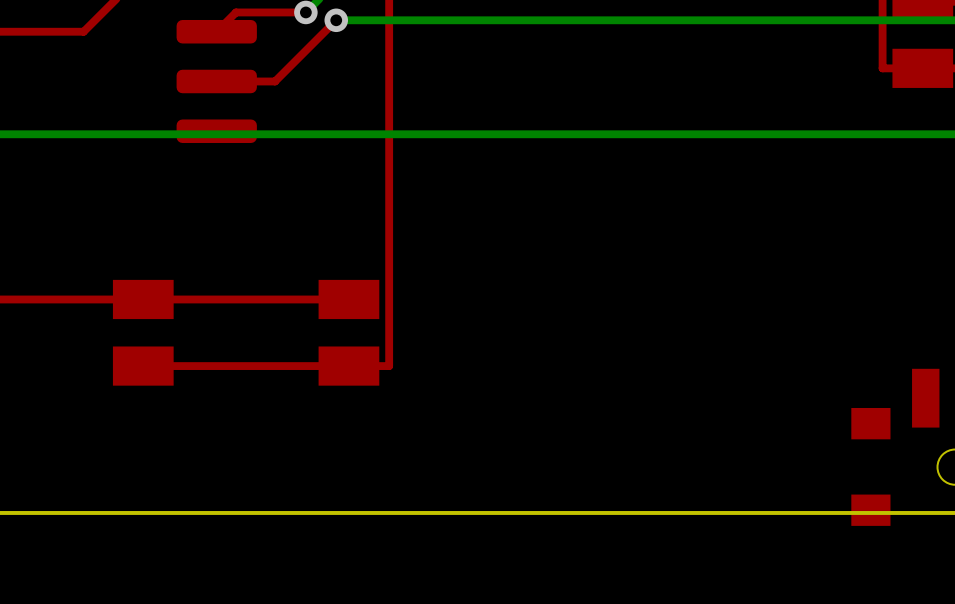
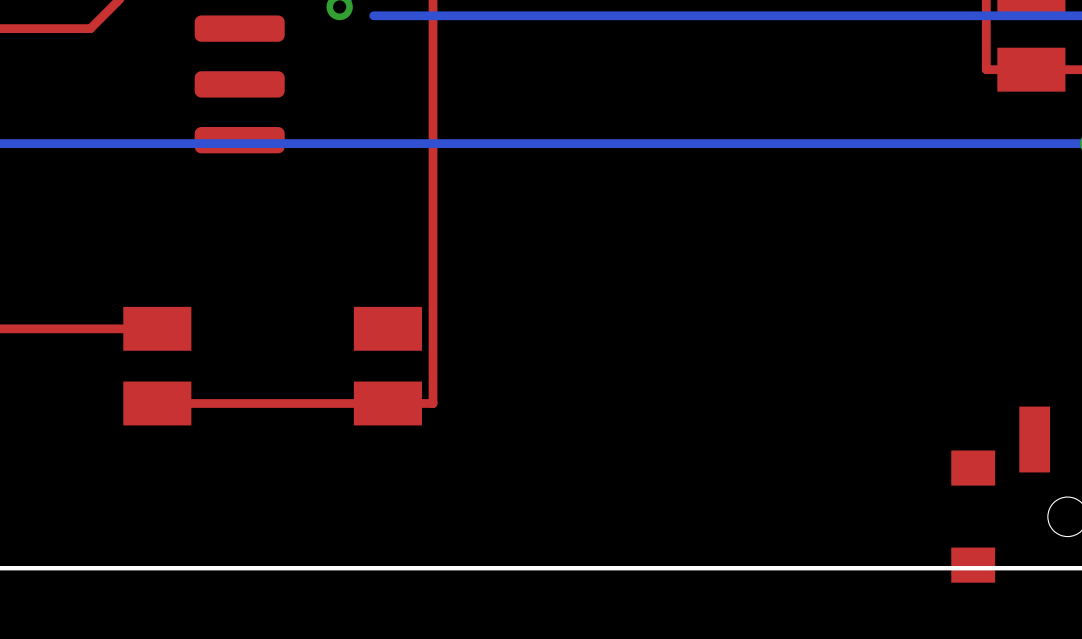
top track: (305, 12) (236, 12) (216, 31) -> none
top track: (336, 20) (275, 81) (216, 81) -> none
via: (336, 20) -> none
top track: (348, 299) (143, 299) -> none

